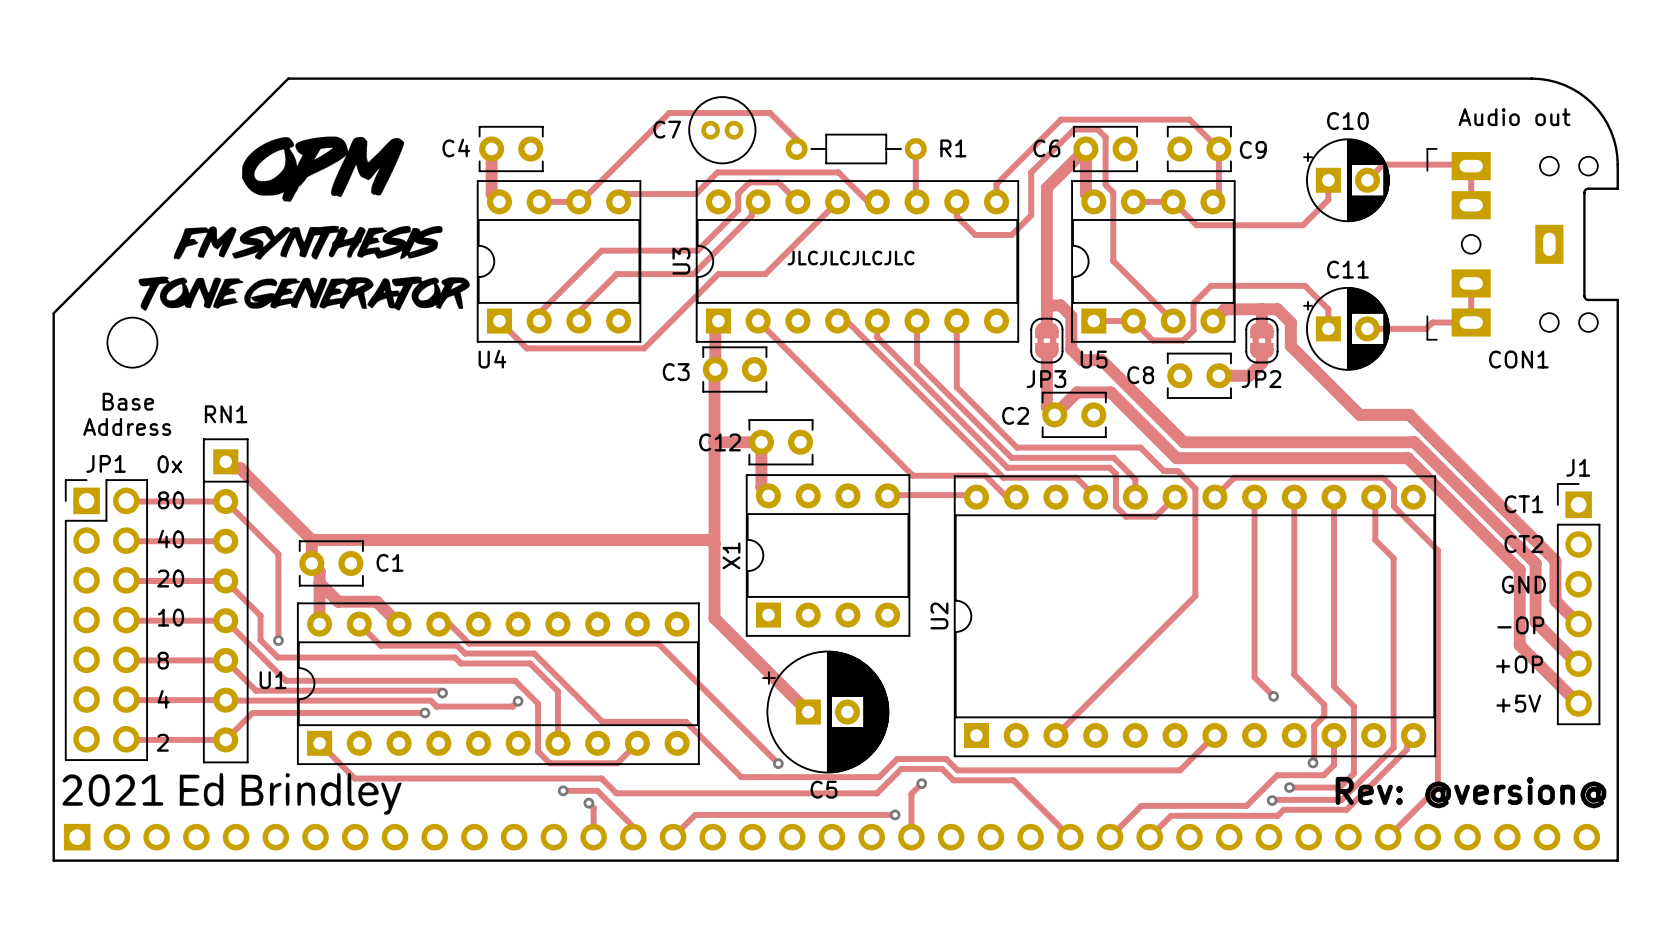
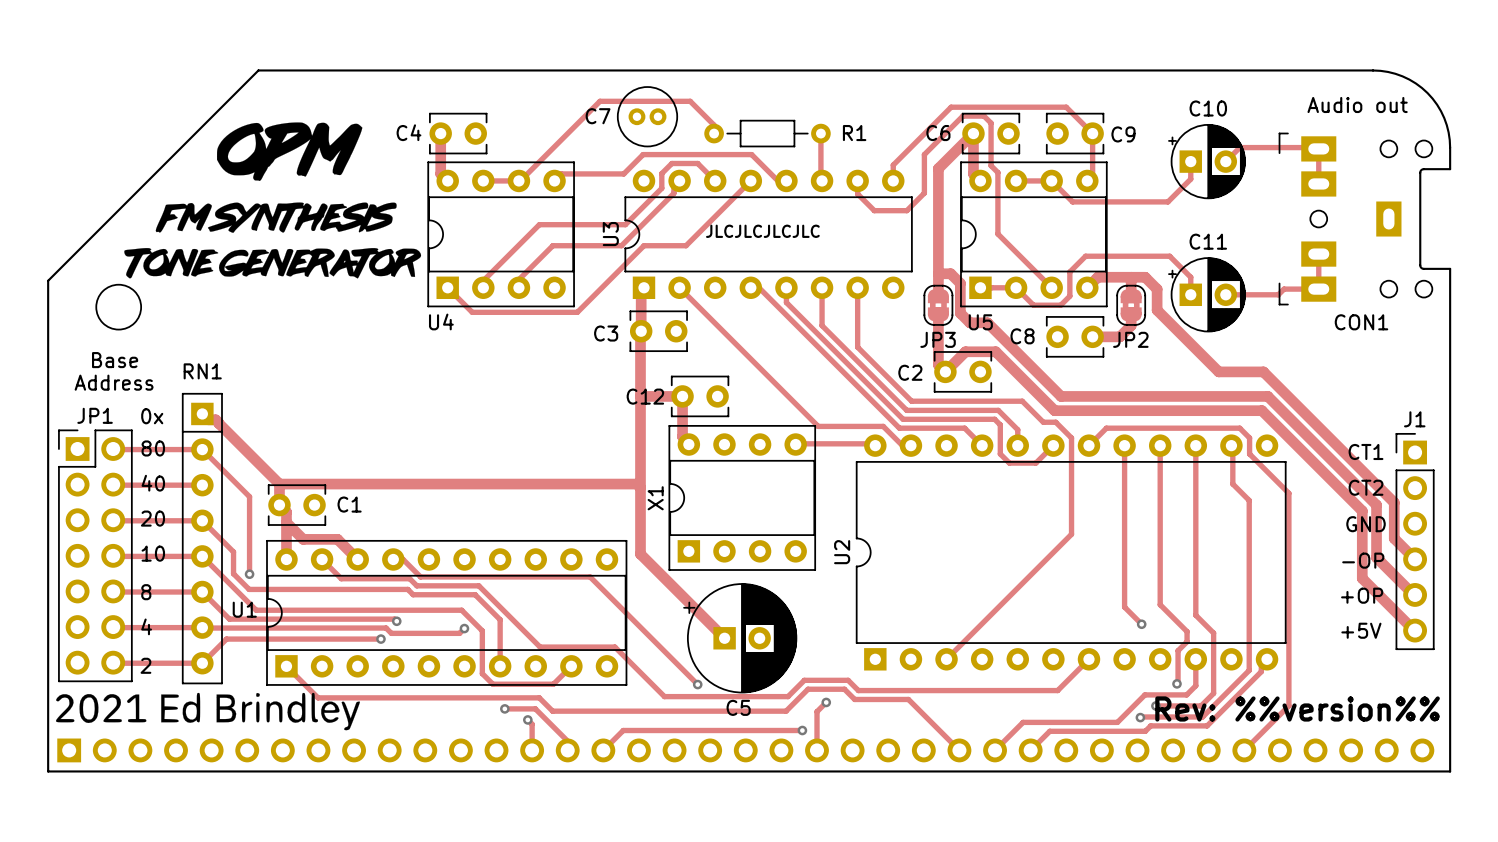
U3 footprint: [695, 180, 1020, 343] -> [624, 169, 913, 299]
U2 footprint: [953, 475, 1437, 758] -> [855, 434, 1287, 671]
text: Rev: @version@ (1470, 792) -> Rev: %%version%% (1297, 708)

